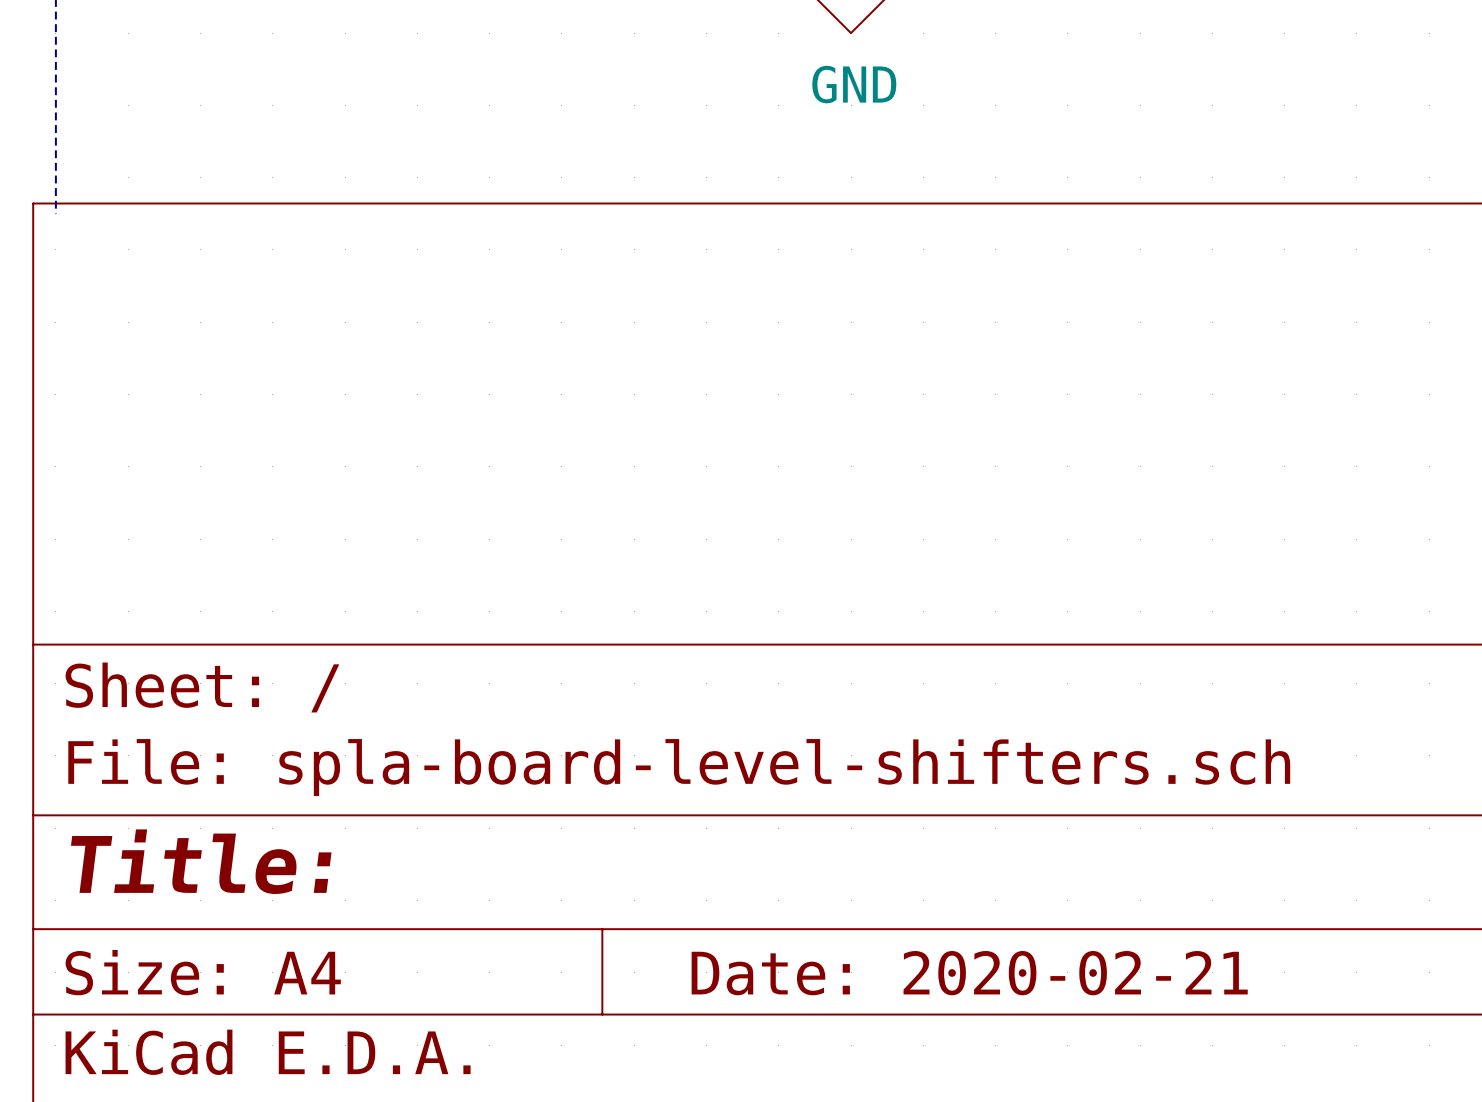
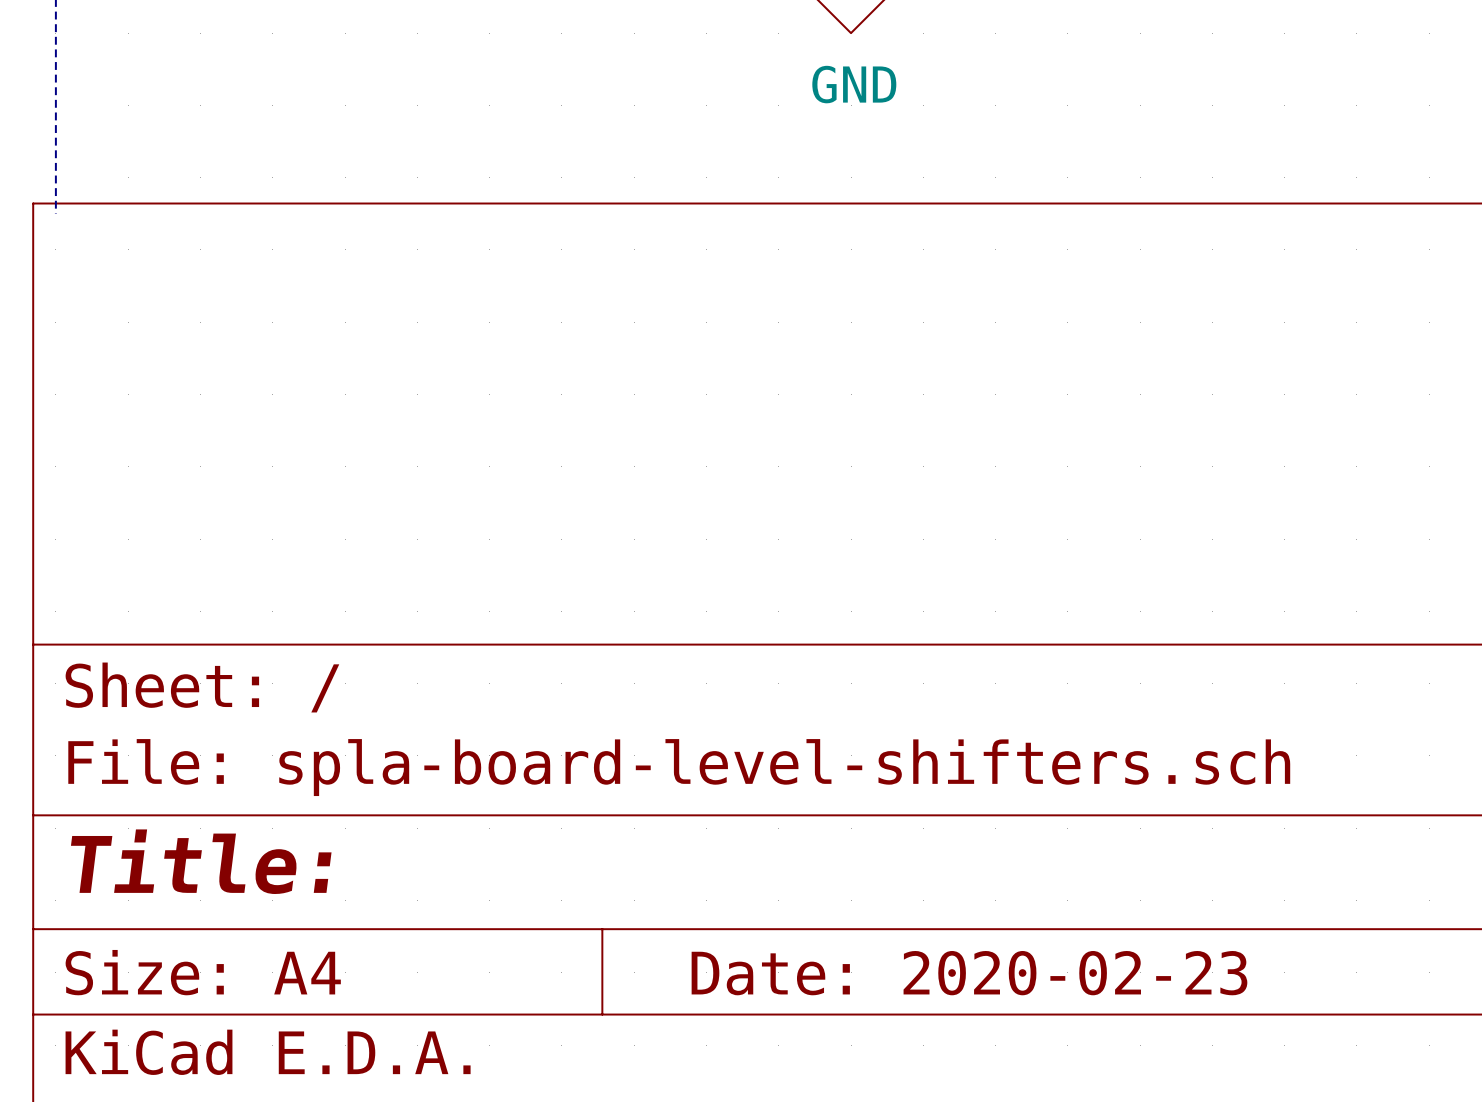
title block: Date: 2020-02-21 (969, 973) -> Date: 2020-02-23 (969, 973)

